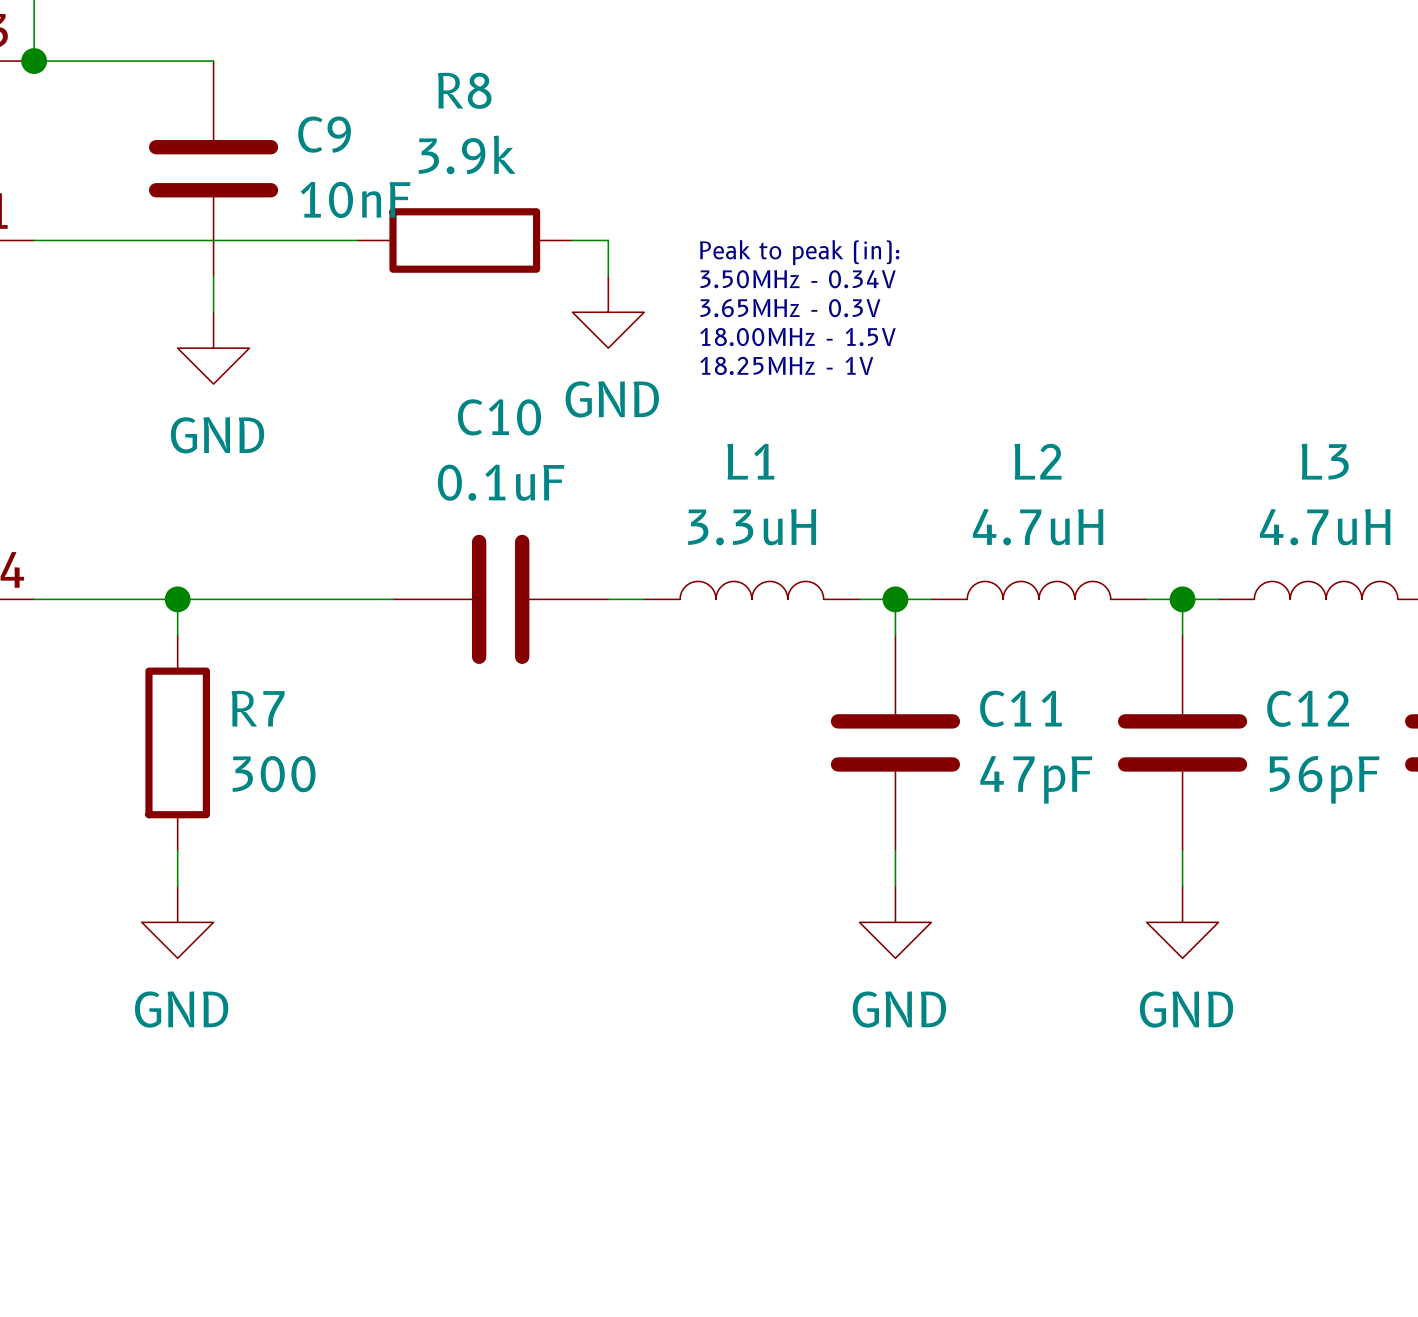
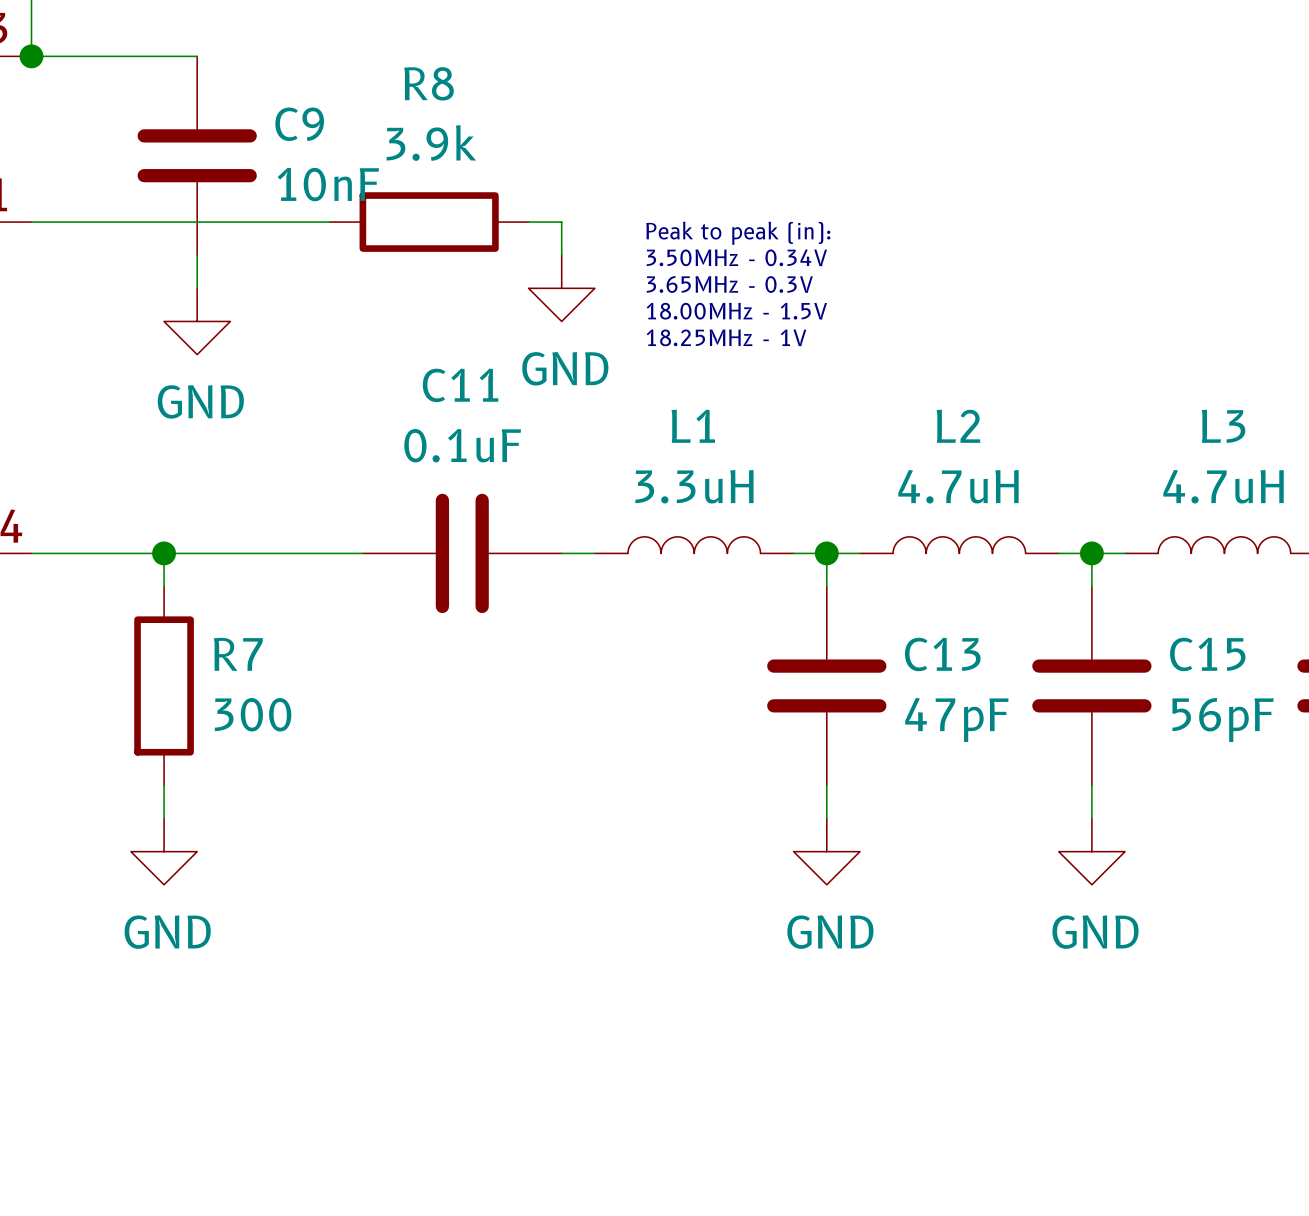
C10 name: C10 (499, 417) -> C11 (460, 385)
C11 name: C11 (1020, 708) -> C13 (942, 654)
C12 name: C12 (1308, 708) -> C15 (1207, 654)

